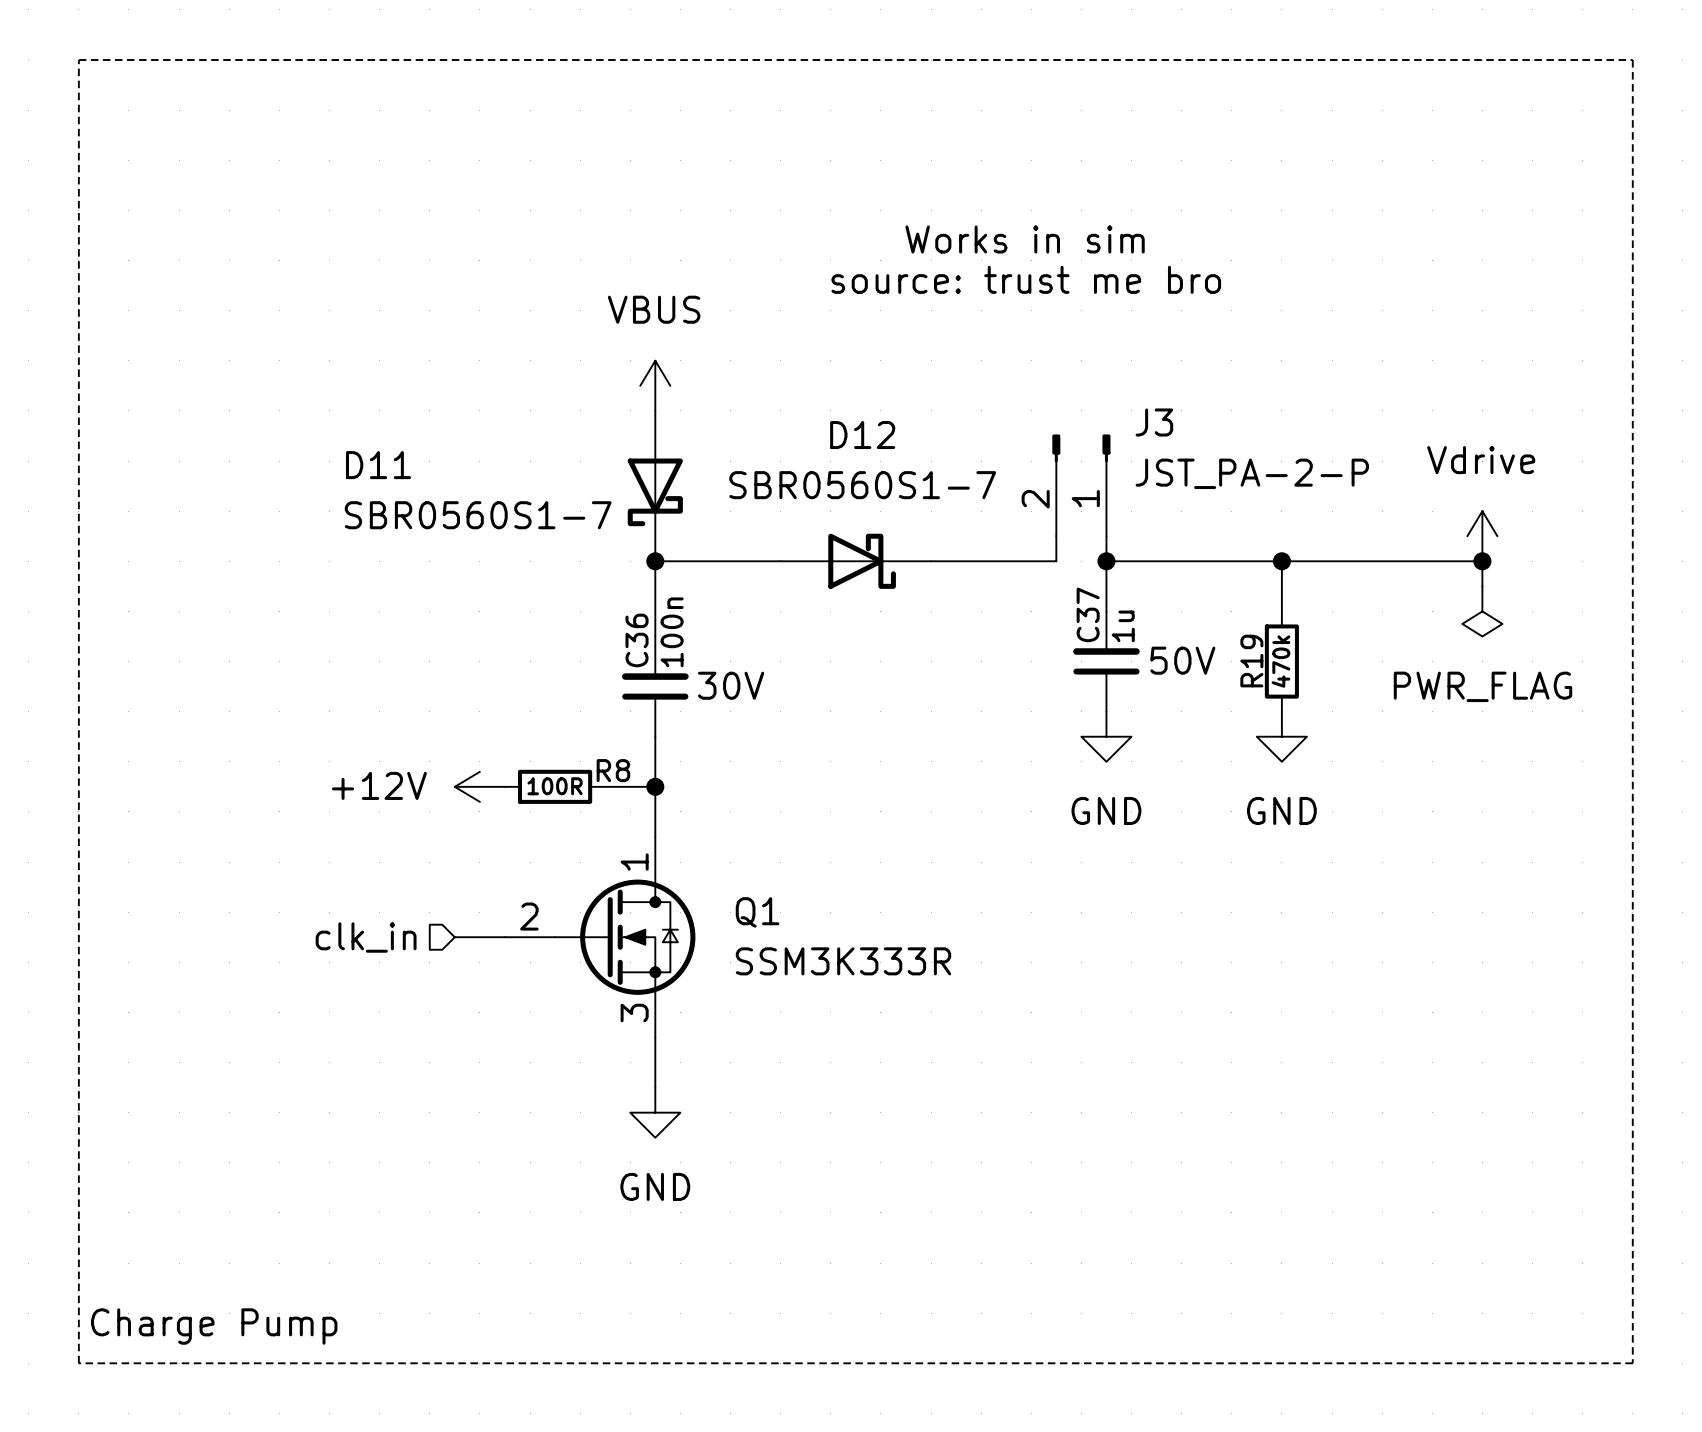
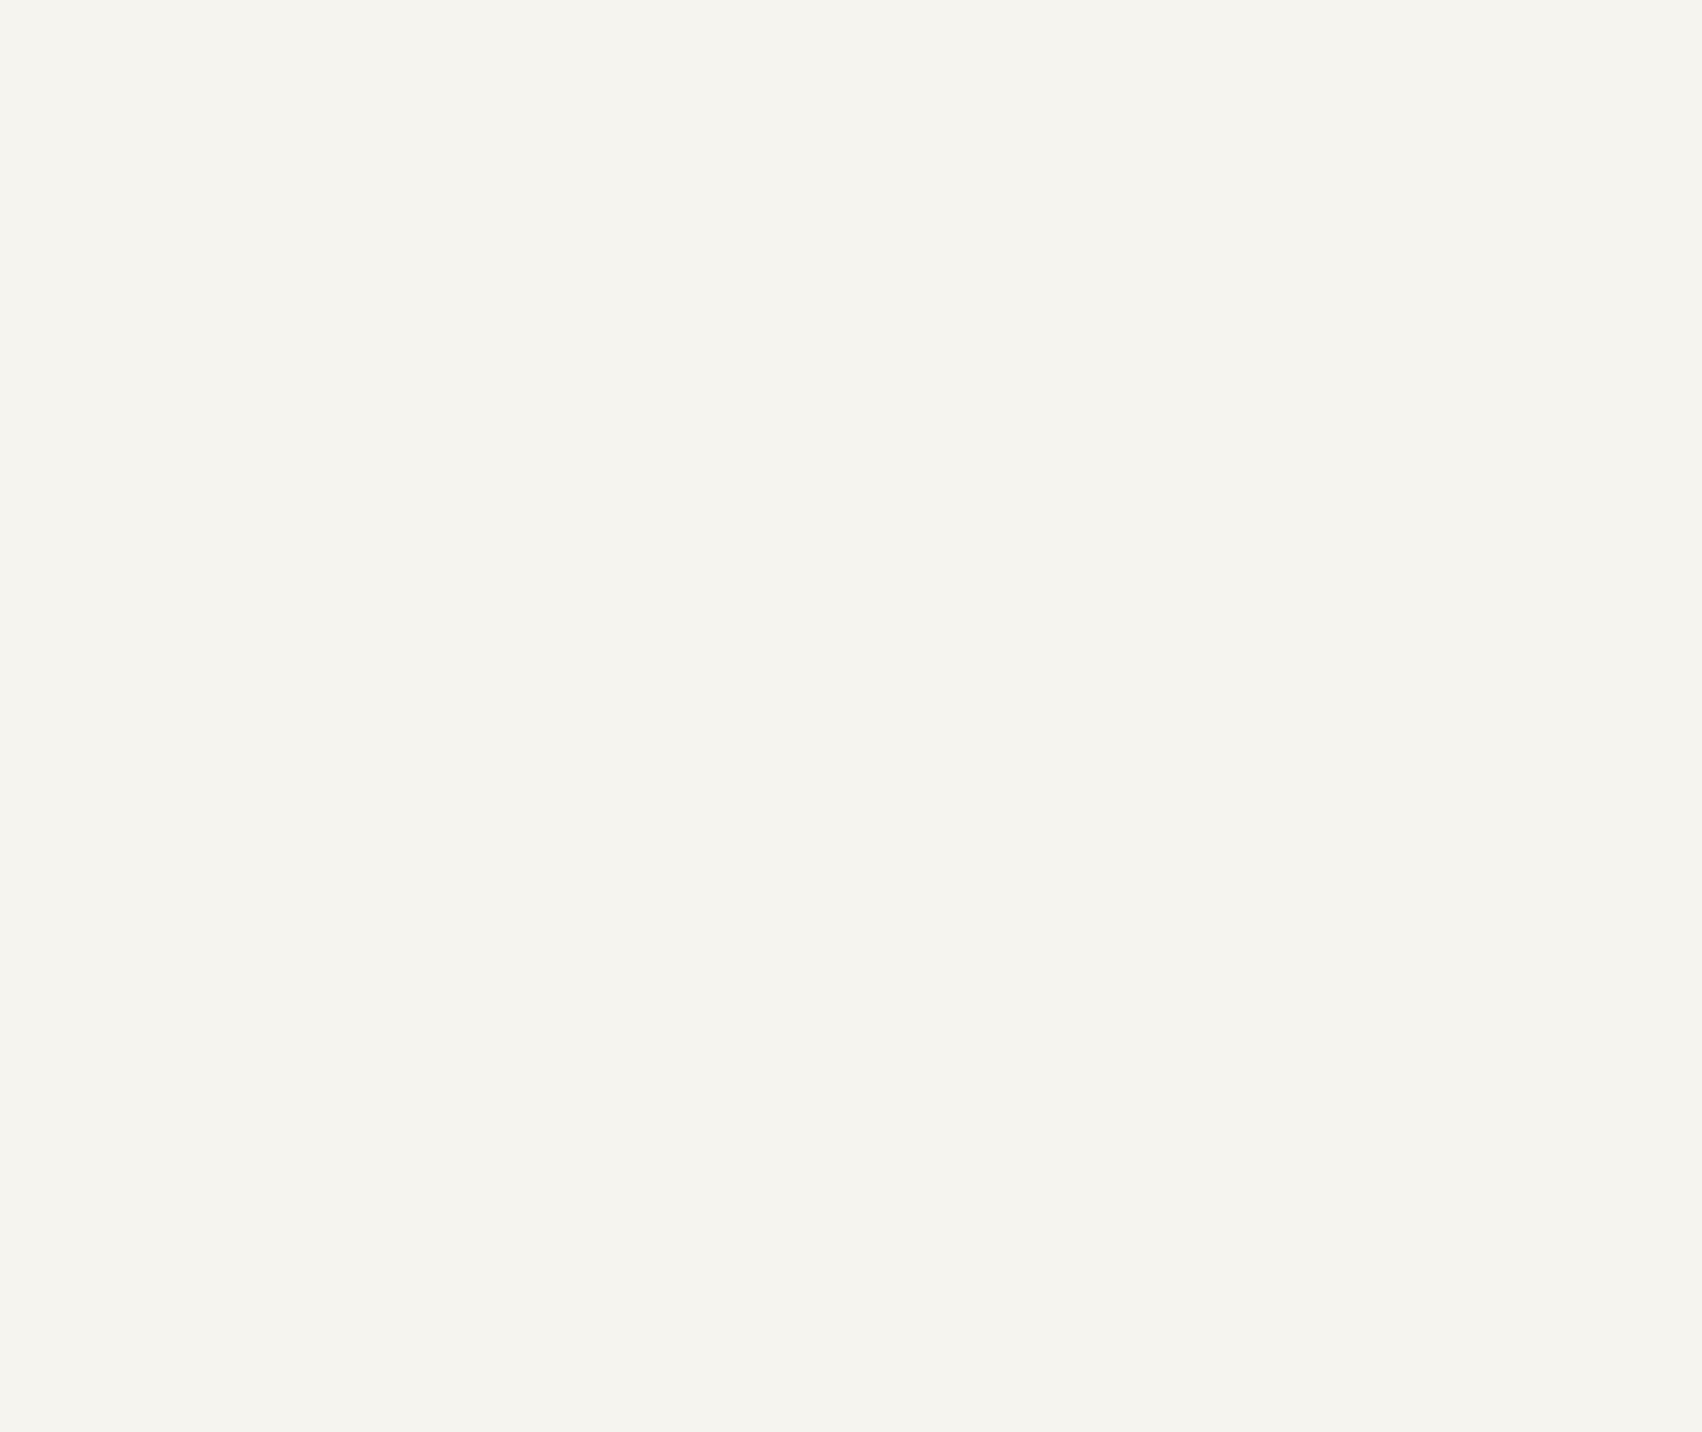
line: (78, 60) (1632, 60) (1632, 1363) (78, 1363) (78, 60) -> none
text: Works in sim (1025, 239) -> none
text: source: trust me bro (1026, 279) -> none
power symbol: VBUS (655, 385) -> none
J3: JST_PA-2-P (1081, 485) -> none
D11: SBR0560S1-7 (655, 486) -> none
wire: (1056, 536) (1056, 561) (931, 561) -> none
wire: (1106, 536) (1106, 611) -> none
power symbol: Vdrive (1482, 536) -> none
junction: (655, 561) -> none
wire: (780, 561) (655, 561) (655, 636) -> none
D12: SBR0560S1-7 (855, 561) -> none
wire: (1106, 561) (1482, 561) (1482, 586) -> none
junction: (1106, 561) -> none
wire: (1281, 561) (1281, 611) -> none
junction: (1281, 561) -> none
junction: (1482, 561) -> none
power symbol: PWR_FLAG (1482, 611) -> none
text: 50V (1182, 660) -> none
C37: 1u (1106, 661) -> none
R19: 470k (1281, 661) -> none
text: 30V (731, 685) -> none
C36: 100n (655, 686) -> none
wire: (655, 736) (655, 836) -> none
power symbol: GND (1106, 736) -> none
power symbol: GND (1281, 736) -> none
power symbol: +12V (479, 786) -> none
R8: 100R (555, 786) -> none
wire: (605, 786) (655, 786) -> none
junction: (655, 786) -> none
hierarchical label: clk_in (366, 937) -> none
wire: (454, 937) (504, 937) -> none
Q1: SSM3K333R (600, 937) -> none
wire: (655, 1037) (655, 1087) -> none
power symbol: GND (655, 1112) -> none
text: Charge Pump (214, 1326) -> none

